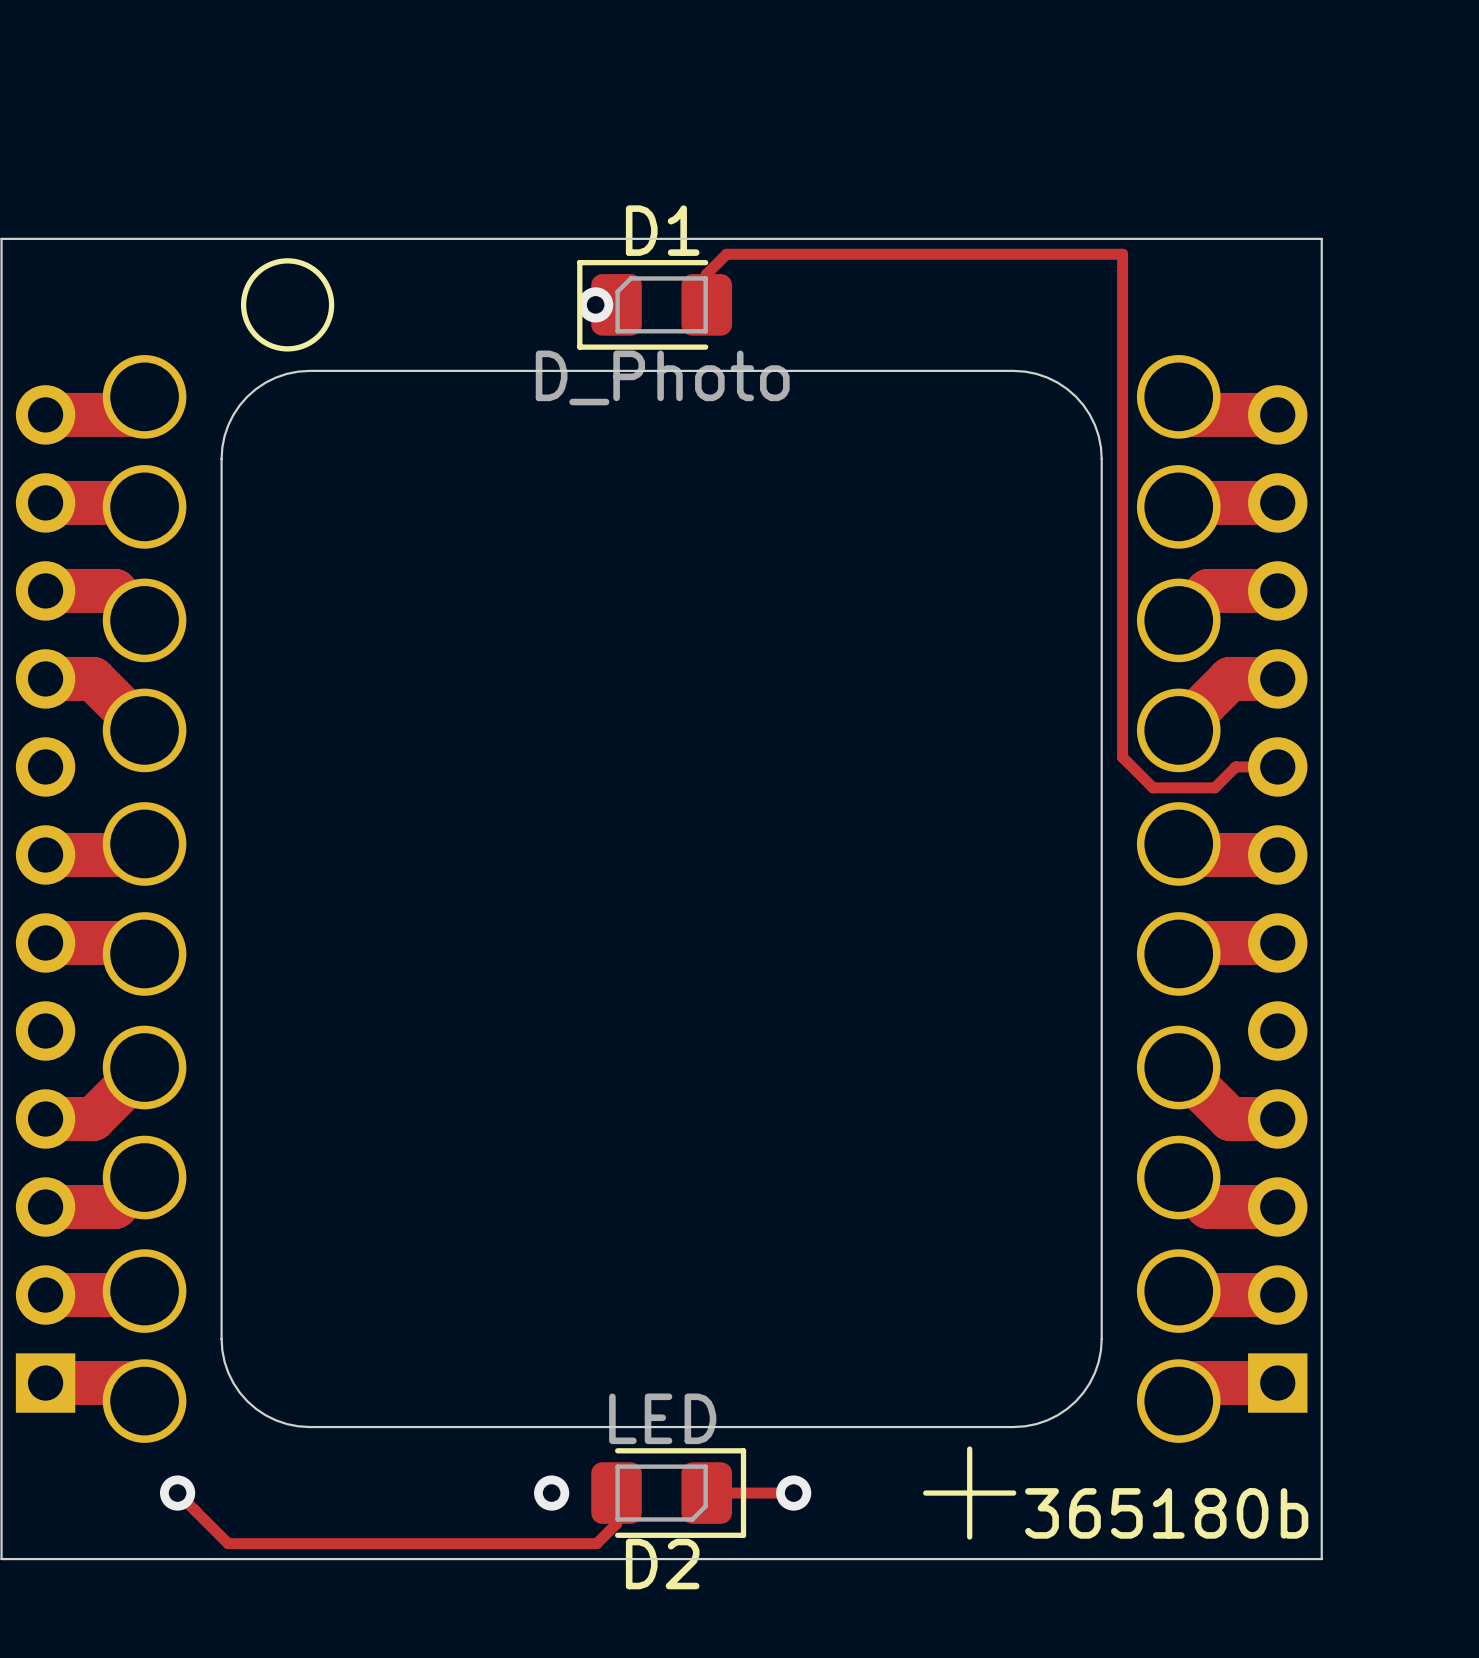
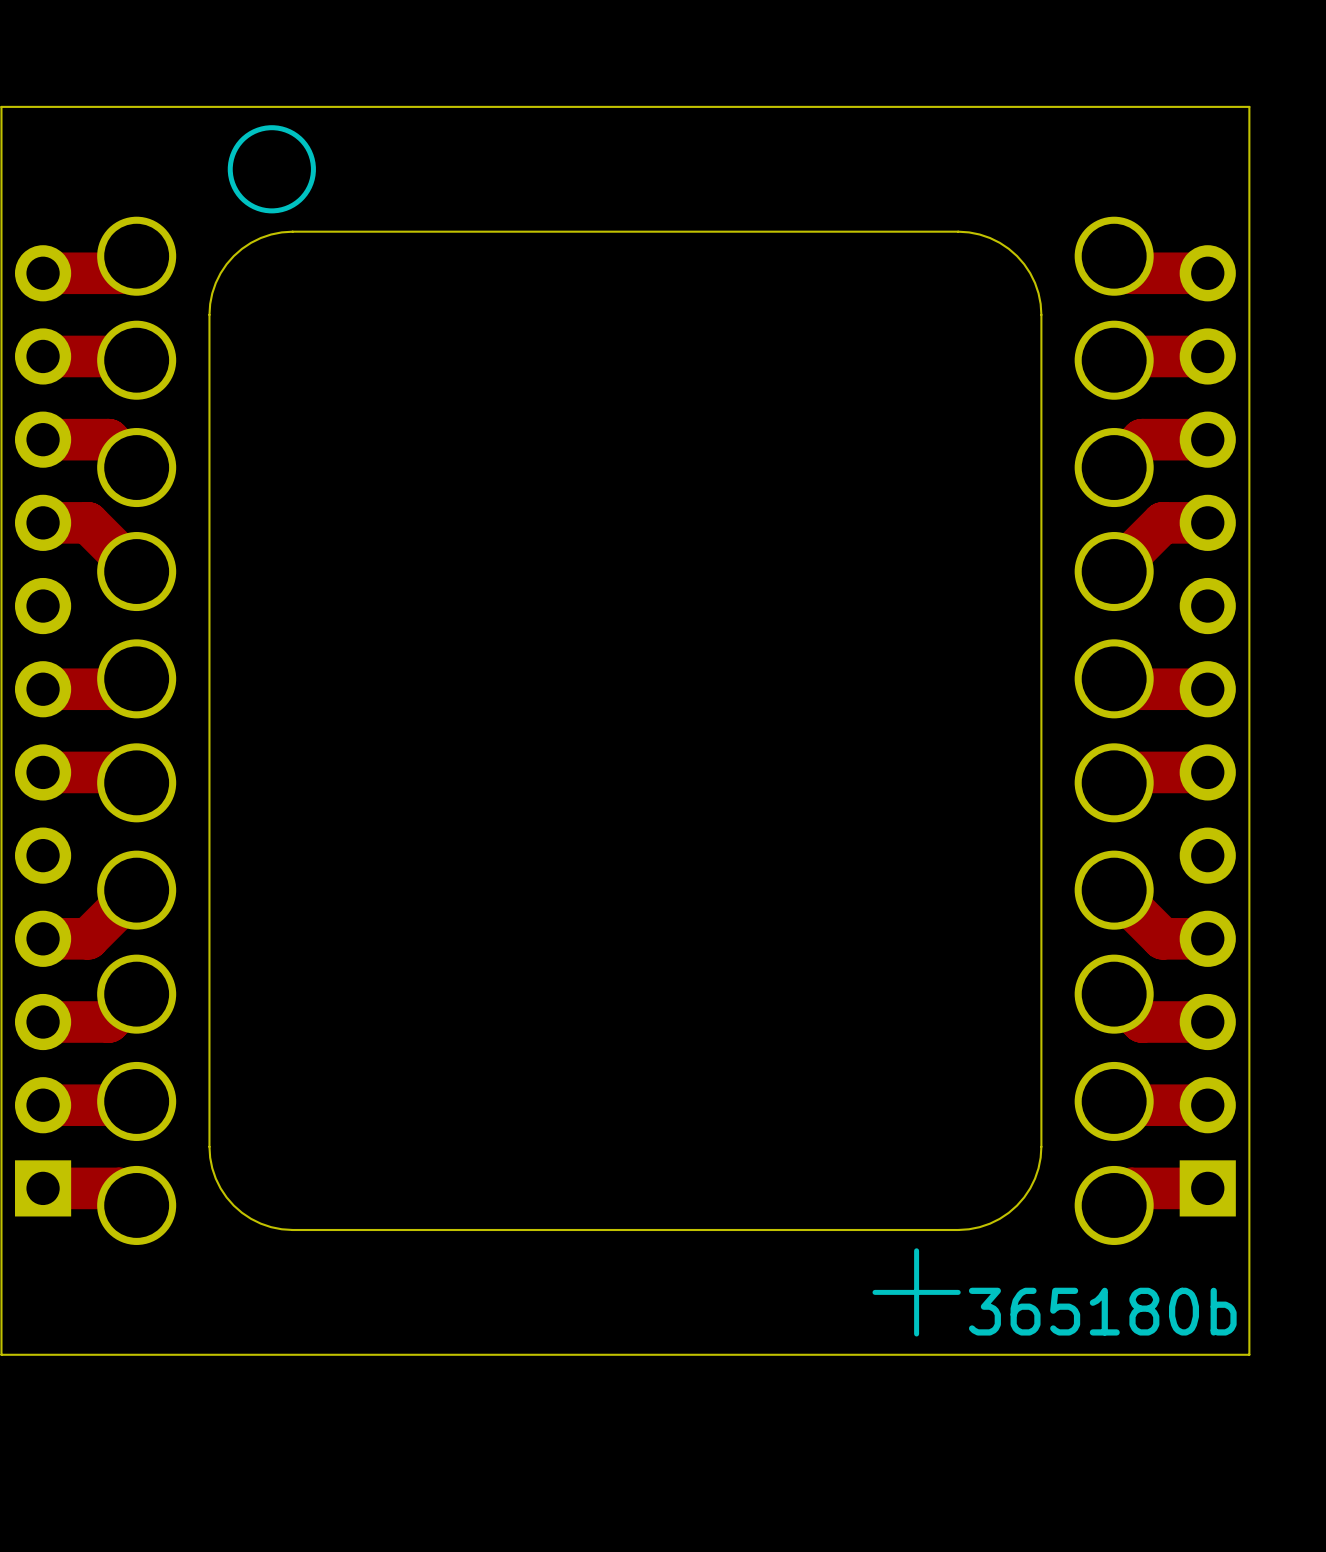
via: (595, 304) -> none
D1: D_Photo (654, 304) -> none
track: (706, 304) (706, 274) (726, 254) (1122, 254) (1122, 757) (1153, 787) (1214, 787) (1235, 766) (1277, 766) -> none
track: (177, 1493) (228, 1543) (596, 1543) (616, 1523) (616, 1493) -> none
via: (177, 1493) -> none
via: (551, 1493) -> none
D2: LED (668, 1493) -> none
track: (706, 1493) (793, 1493) -> none
via: (793, 1493) -> none

